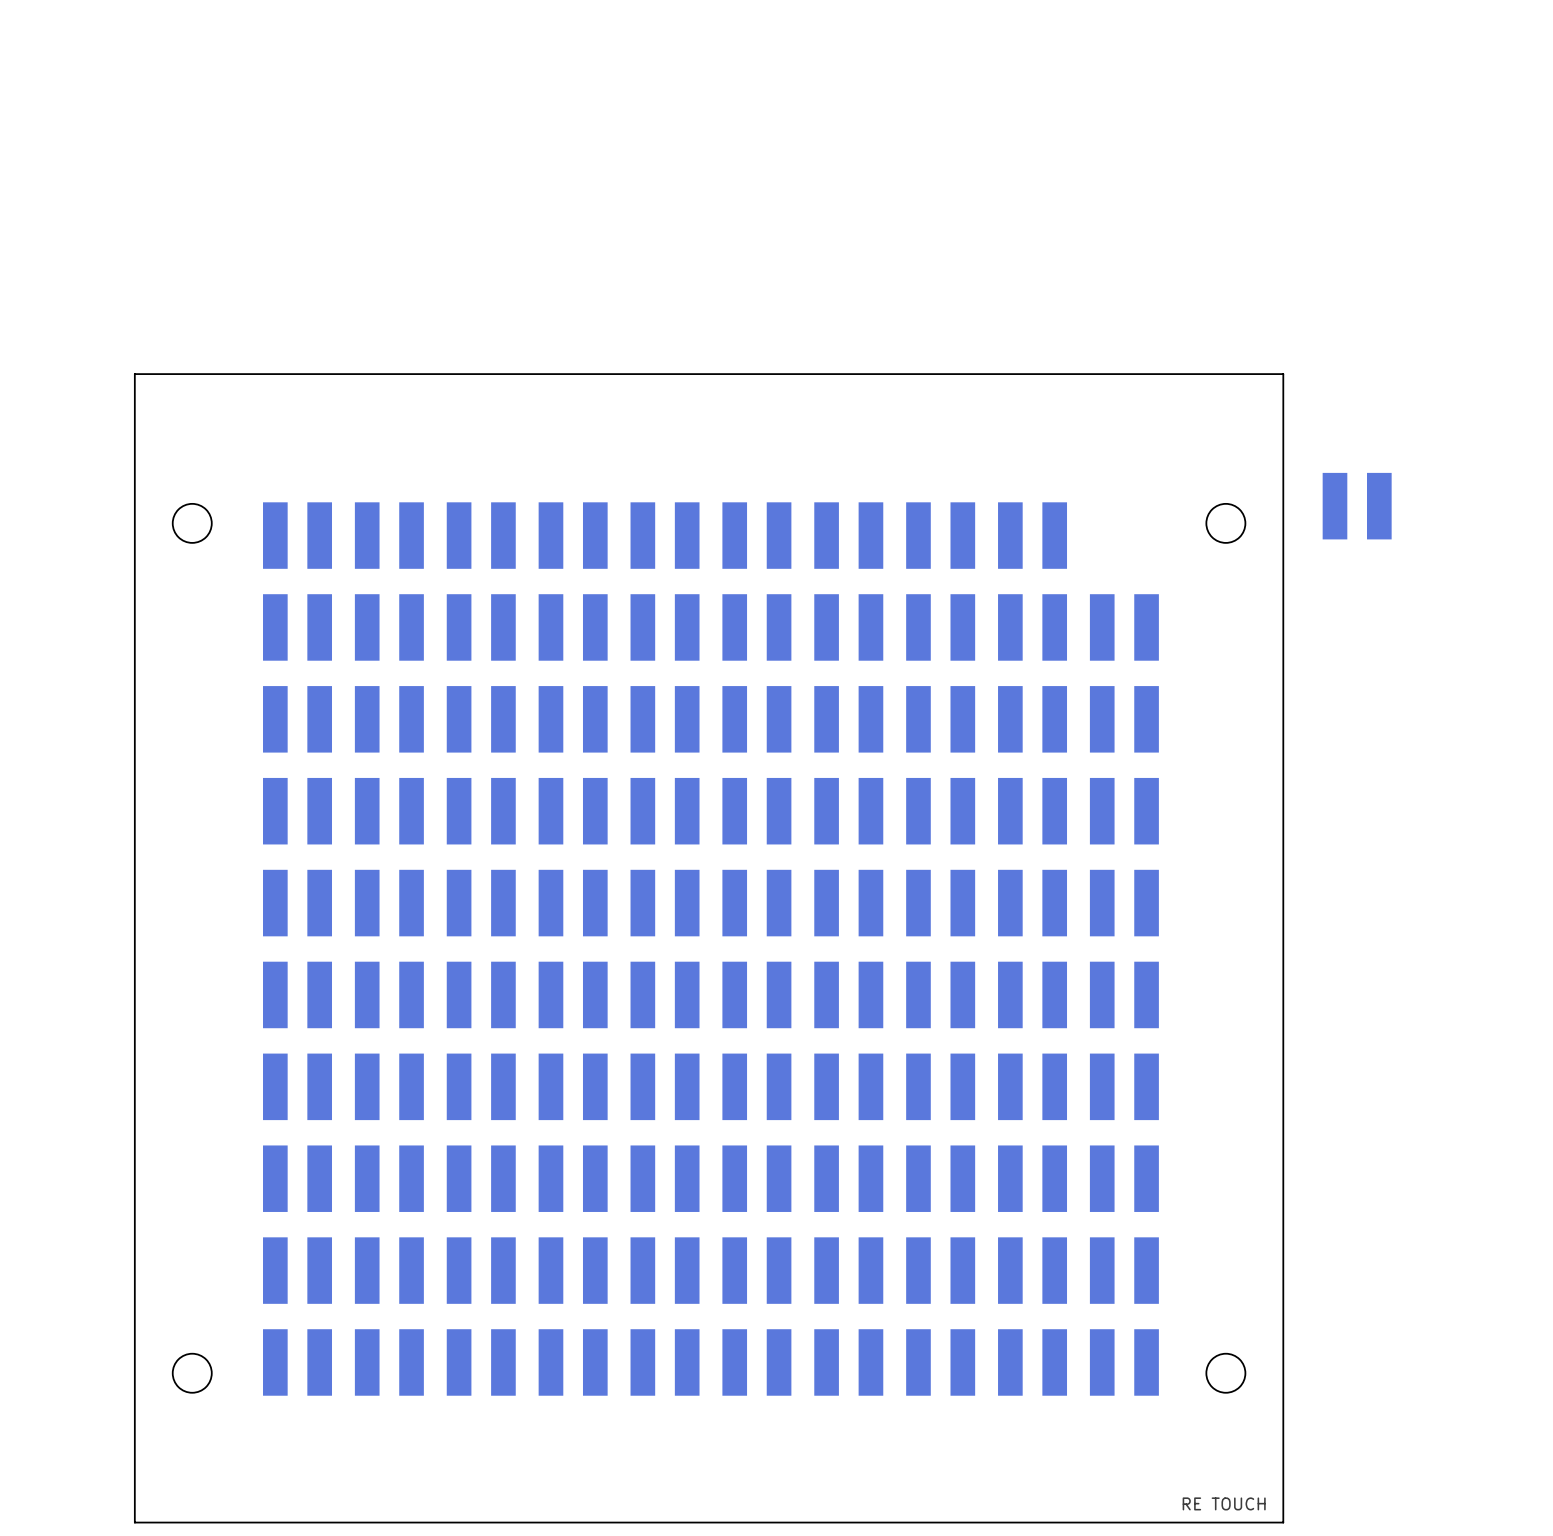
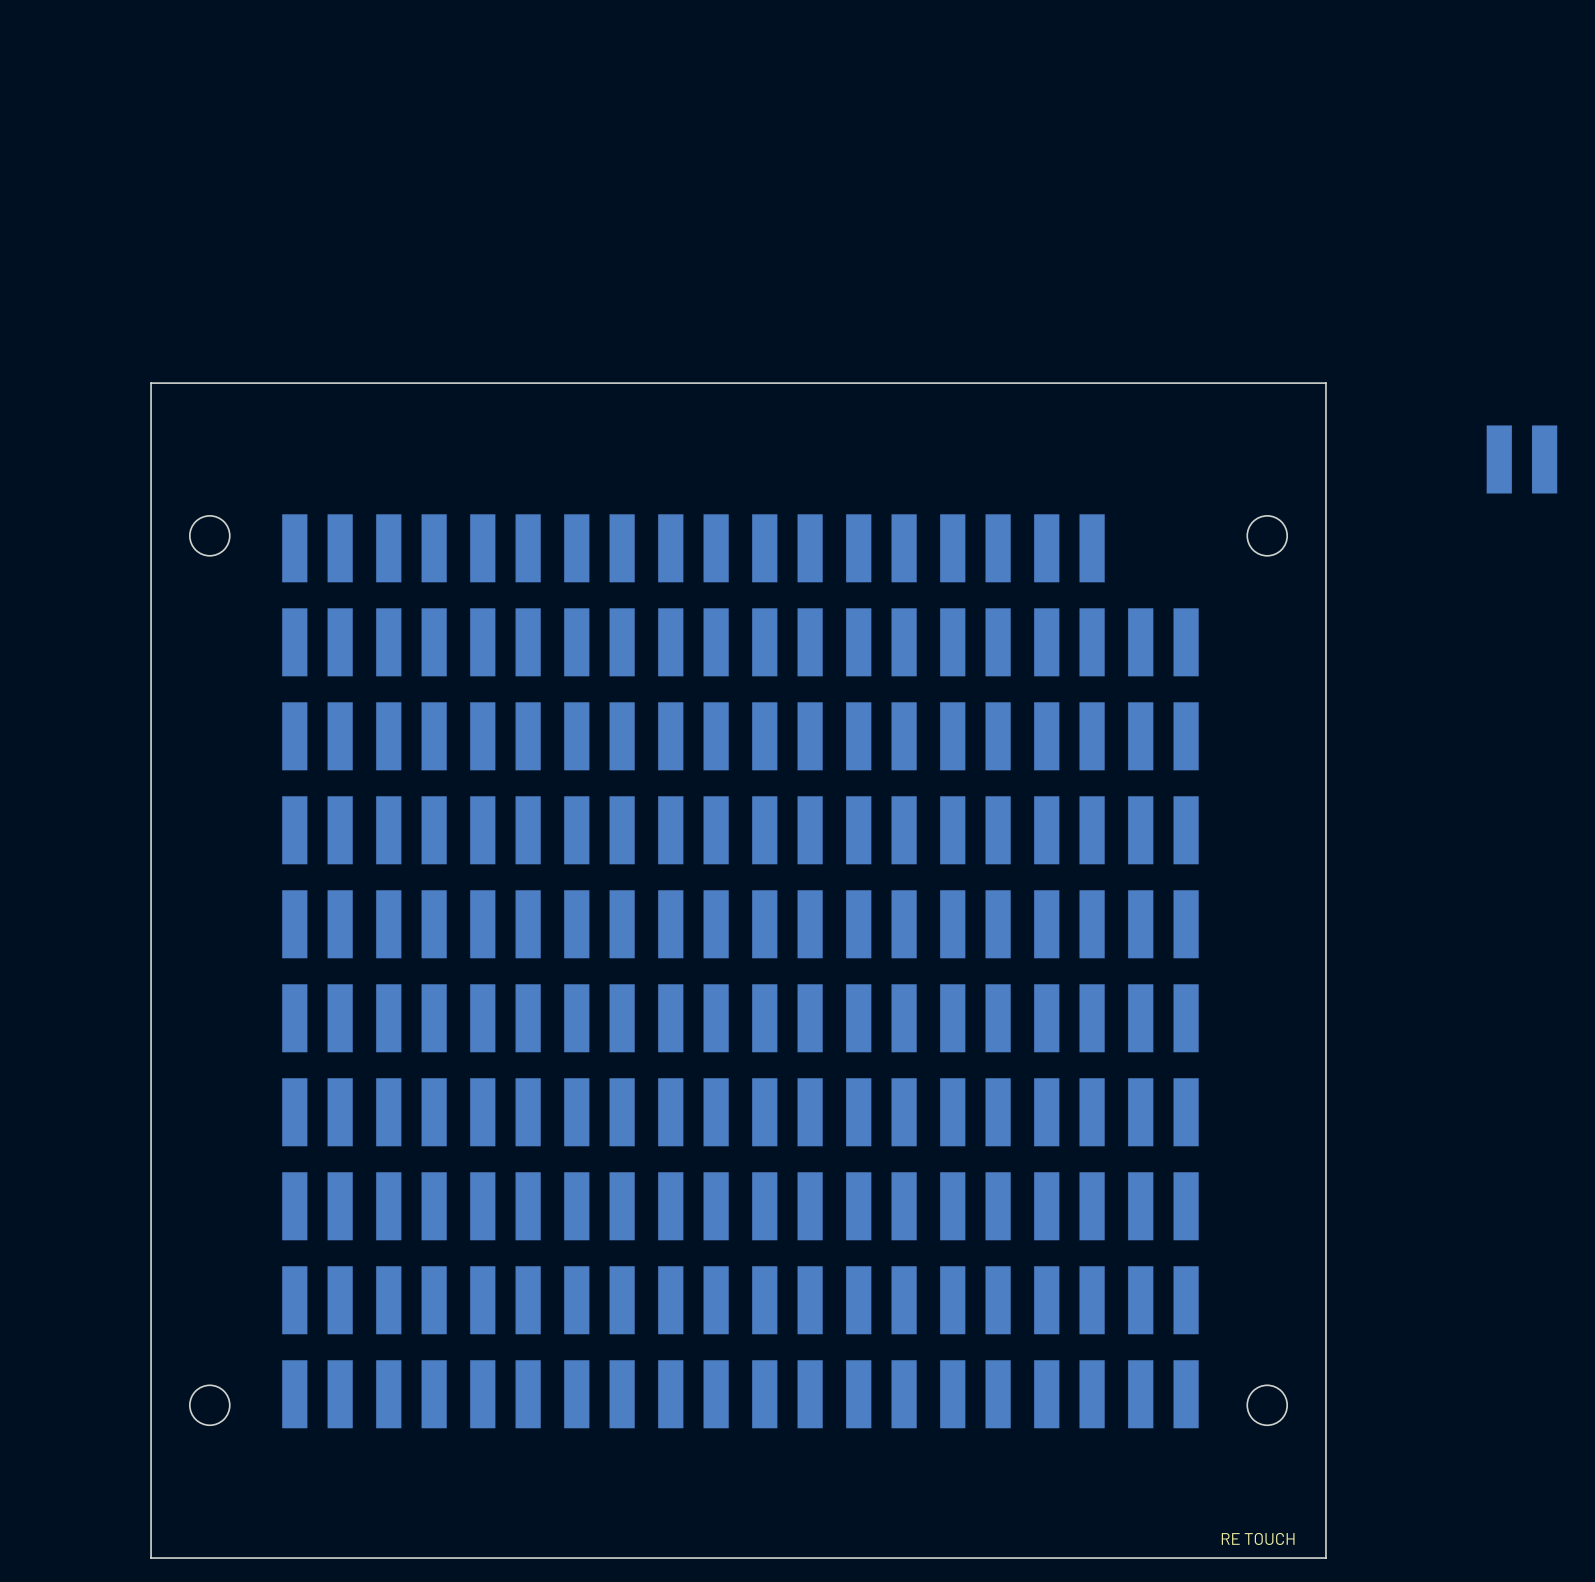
part position: (1357, 506) -> (1521, 459)

